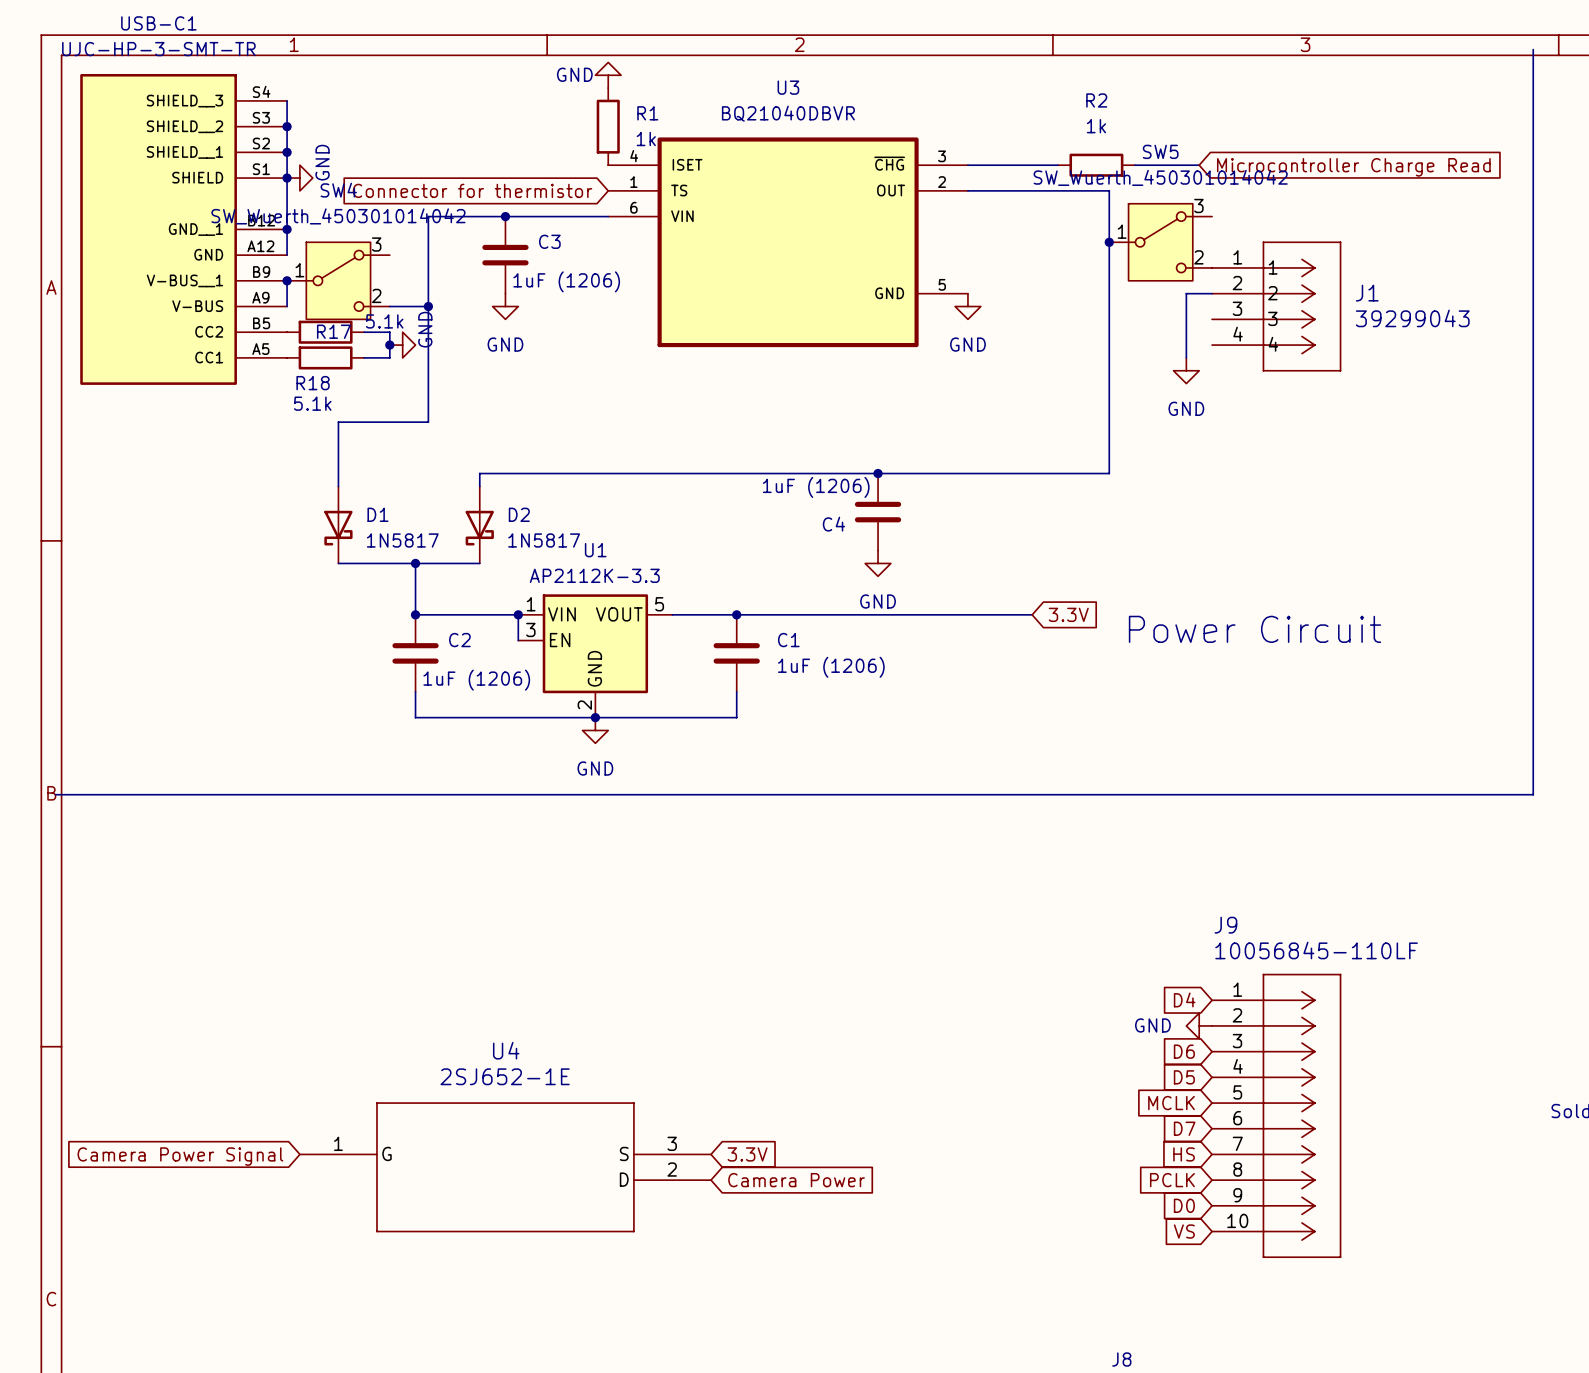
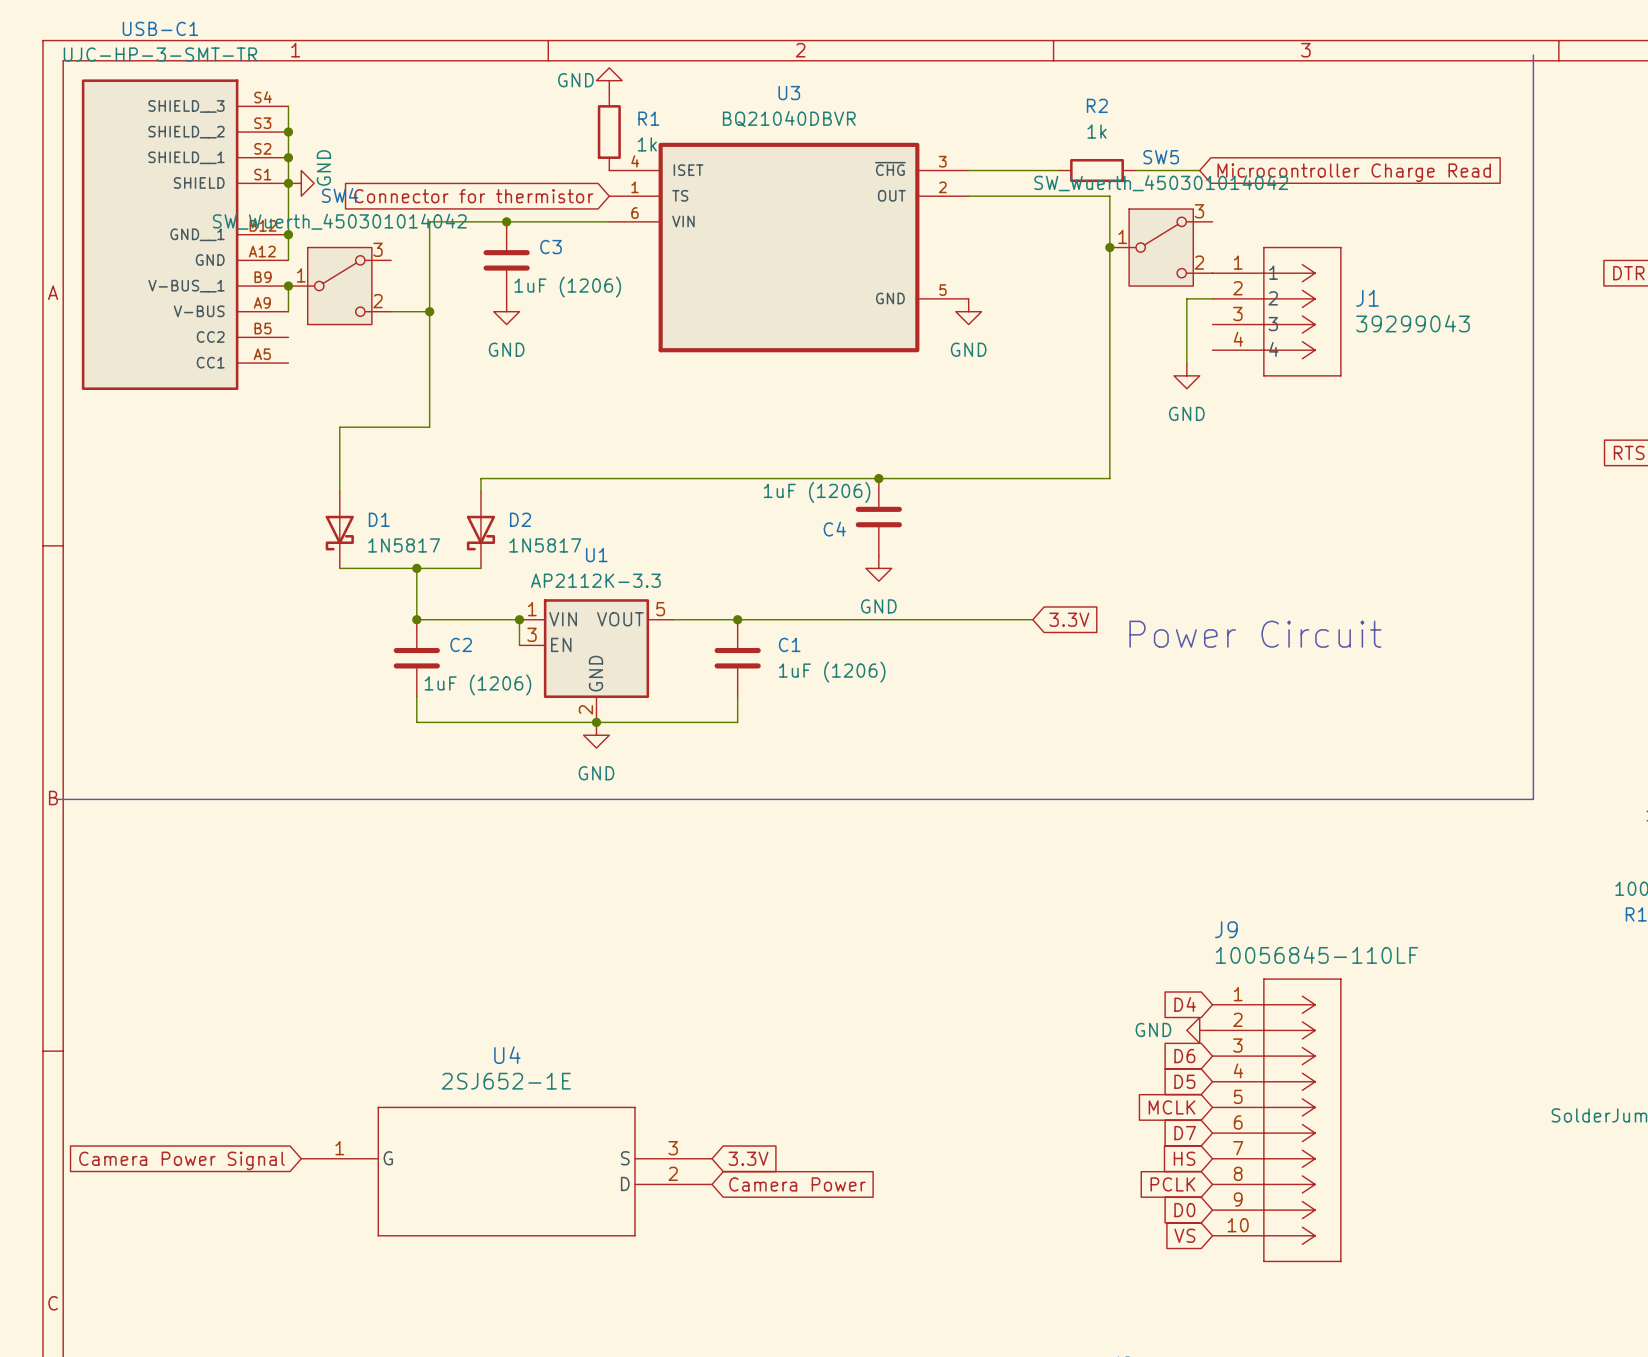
R17: 5.1k (325, 332) -> none
wire: (364, 332) (389, 332) (389, 357) (364, 357) -> none
junction: (389, 345) -> none
power symbol: GND (402, 345) -> none
R18: 5.1k (325, 357) -> none

